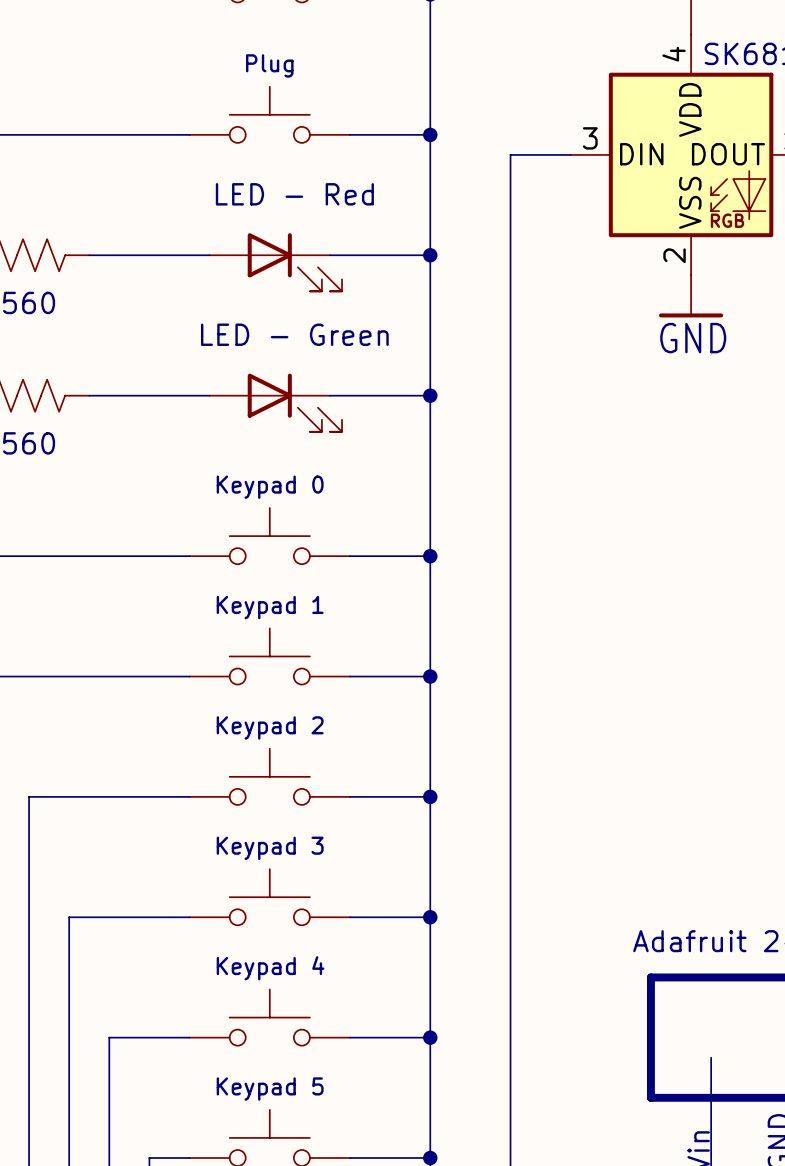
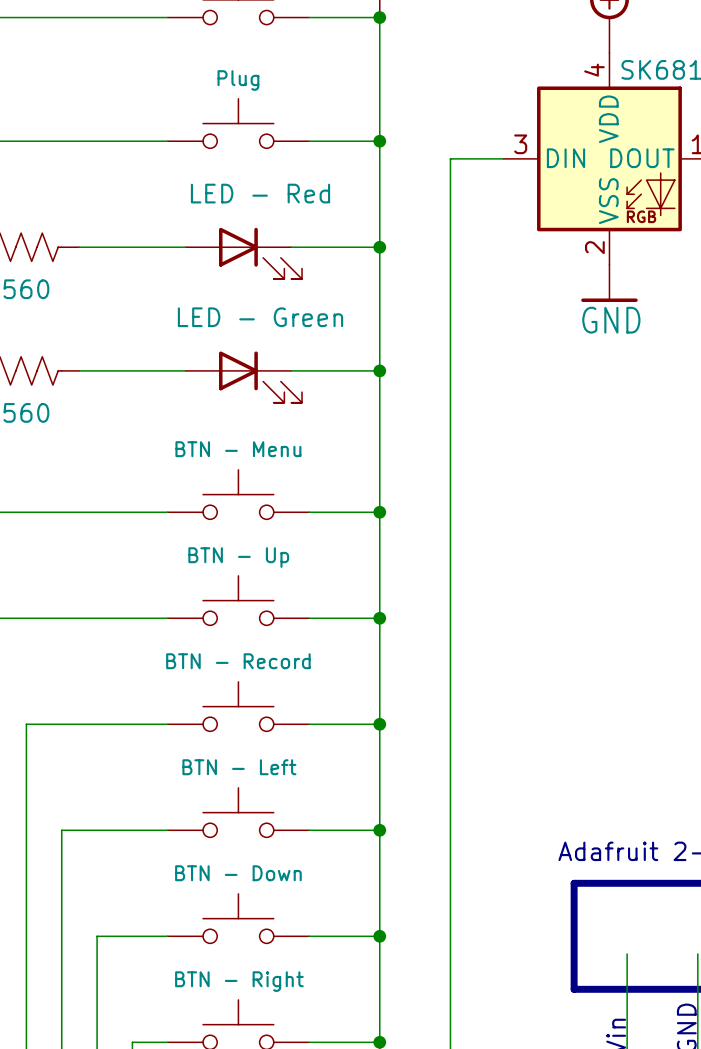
part value: Keypad 0 (270, 487) -> BTN - Menu (238, 449)
part value: Keypad 1 (270, 607) -> BTN - Up (238, 557)
part value: Keypad 2 (270, 727) -> BTN - Record (238, 661)
part value: Keypad 3 (270, 848) -> BTN - Left (239, 767)
part value: Keypad 4 (270, 968) -> BTN - Down (238, 873)
part value: Keypad 5 (270, 1089) -> BTN - Right (239, 981)

